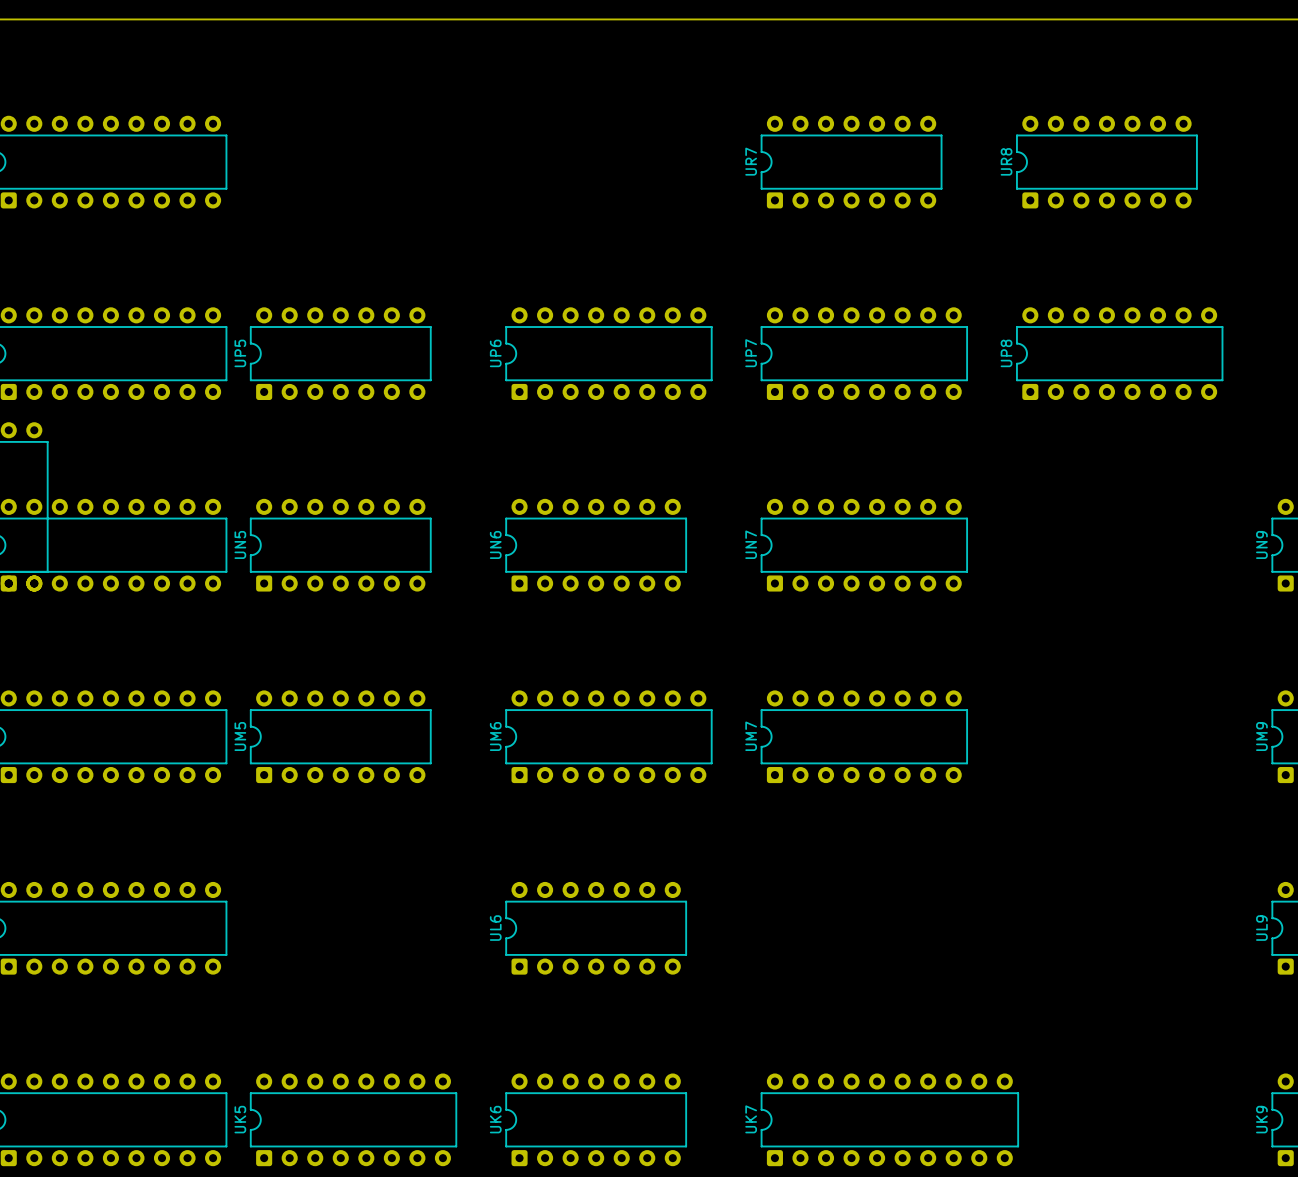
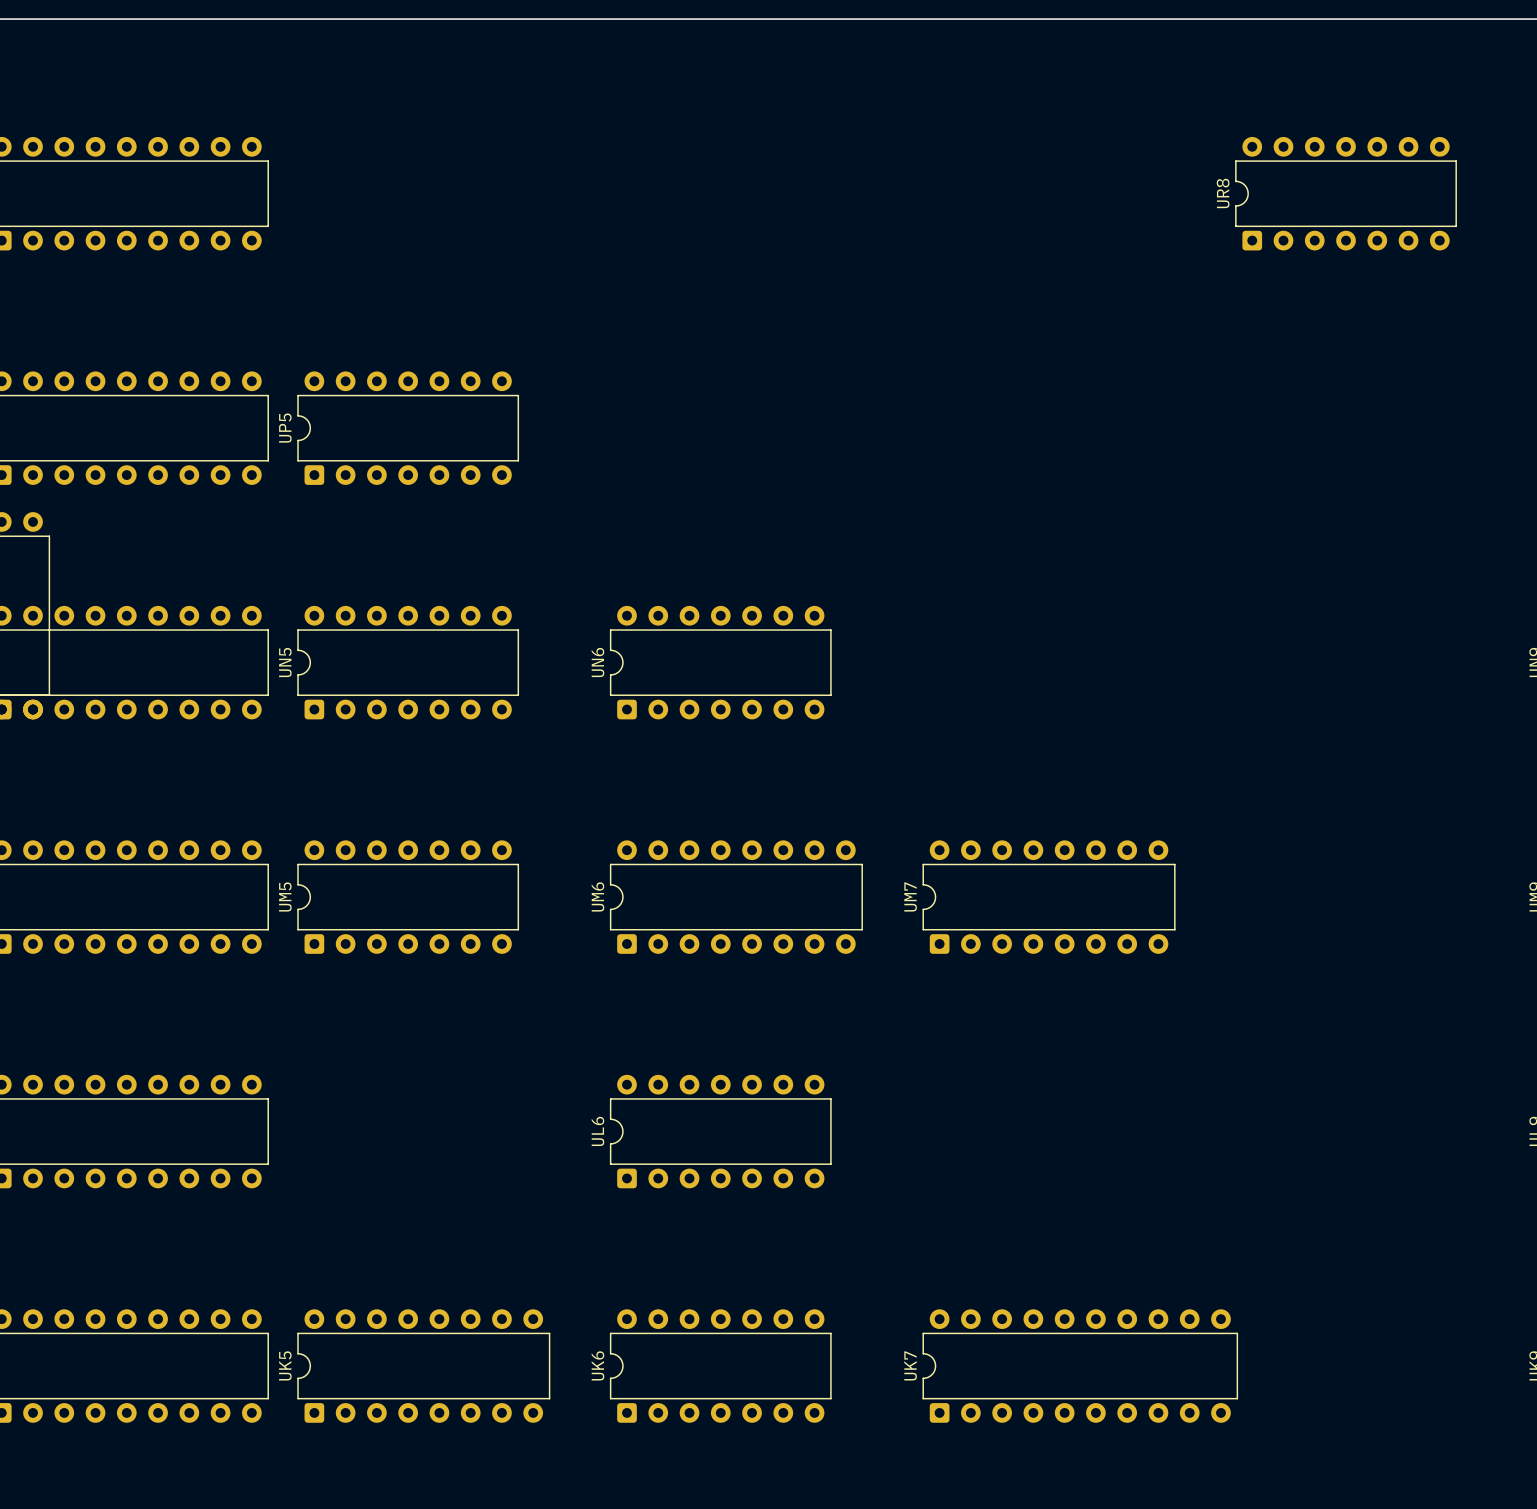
UR7: (851, 162) -> none
UP6: (608, 353) -> none
UP7: (864, 353) -> none
UP8: (1119, 353) -> none
UN7: (864, 545) -> none

